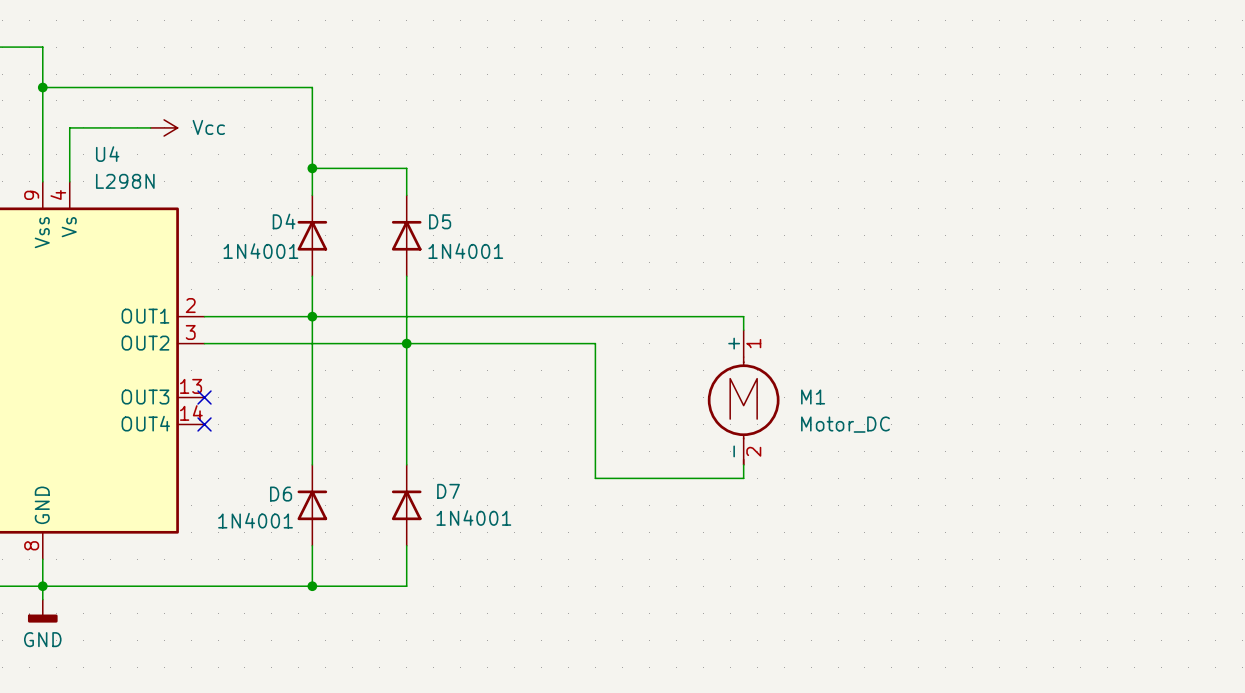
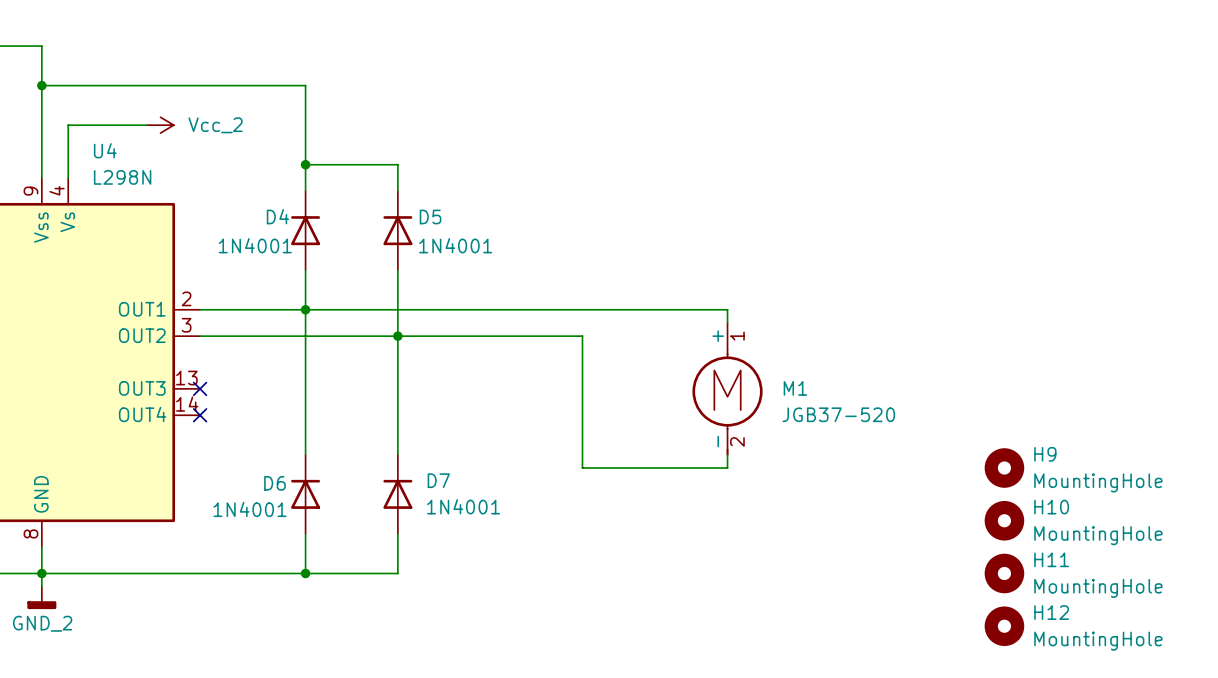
power symbol: Vcc (164, 127) -> Vcc_2 (160, 125)
M1 value: Motor_DC (845, 424) -> JGB37-520 (838, 414)
H9: none -> MountingHole (1004, 468)
H10: none -> MountingHole (1004, 520)
H11: none -> MountingHole (1004, 573)
power symbol: GND (42, 611) -> GND_2 (41, 597)
H12: none -> MountingHole (1004, 626)

